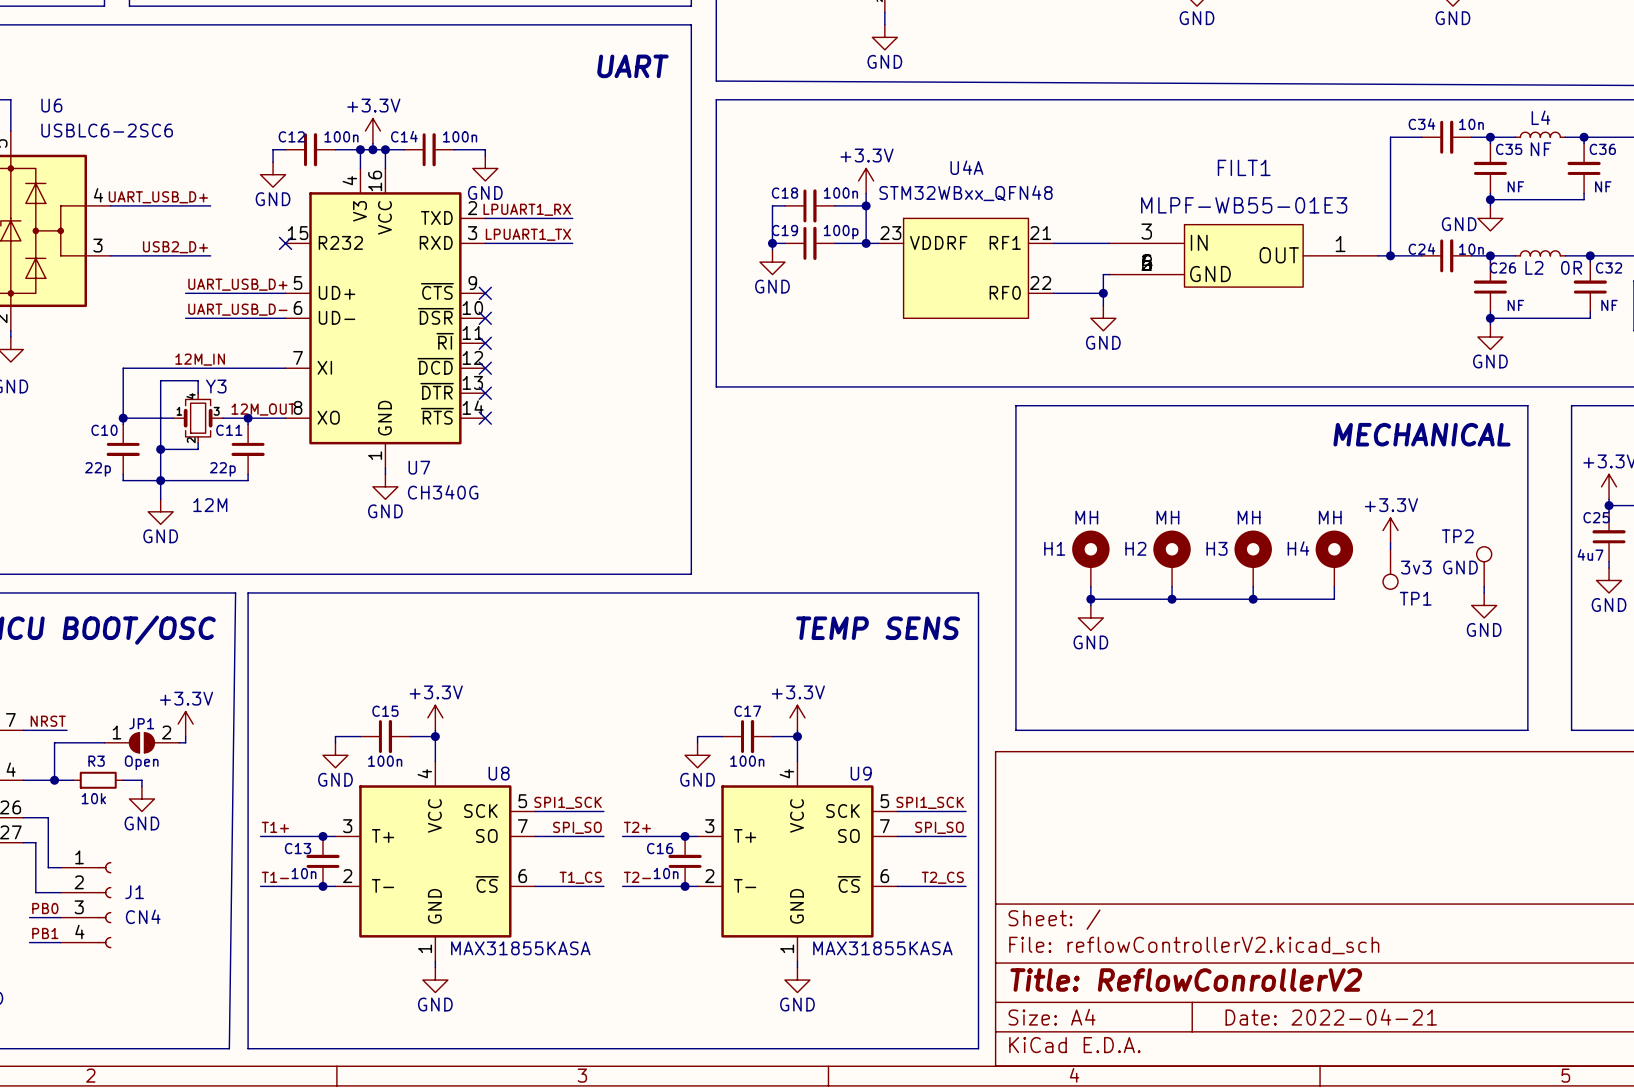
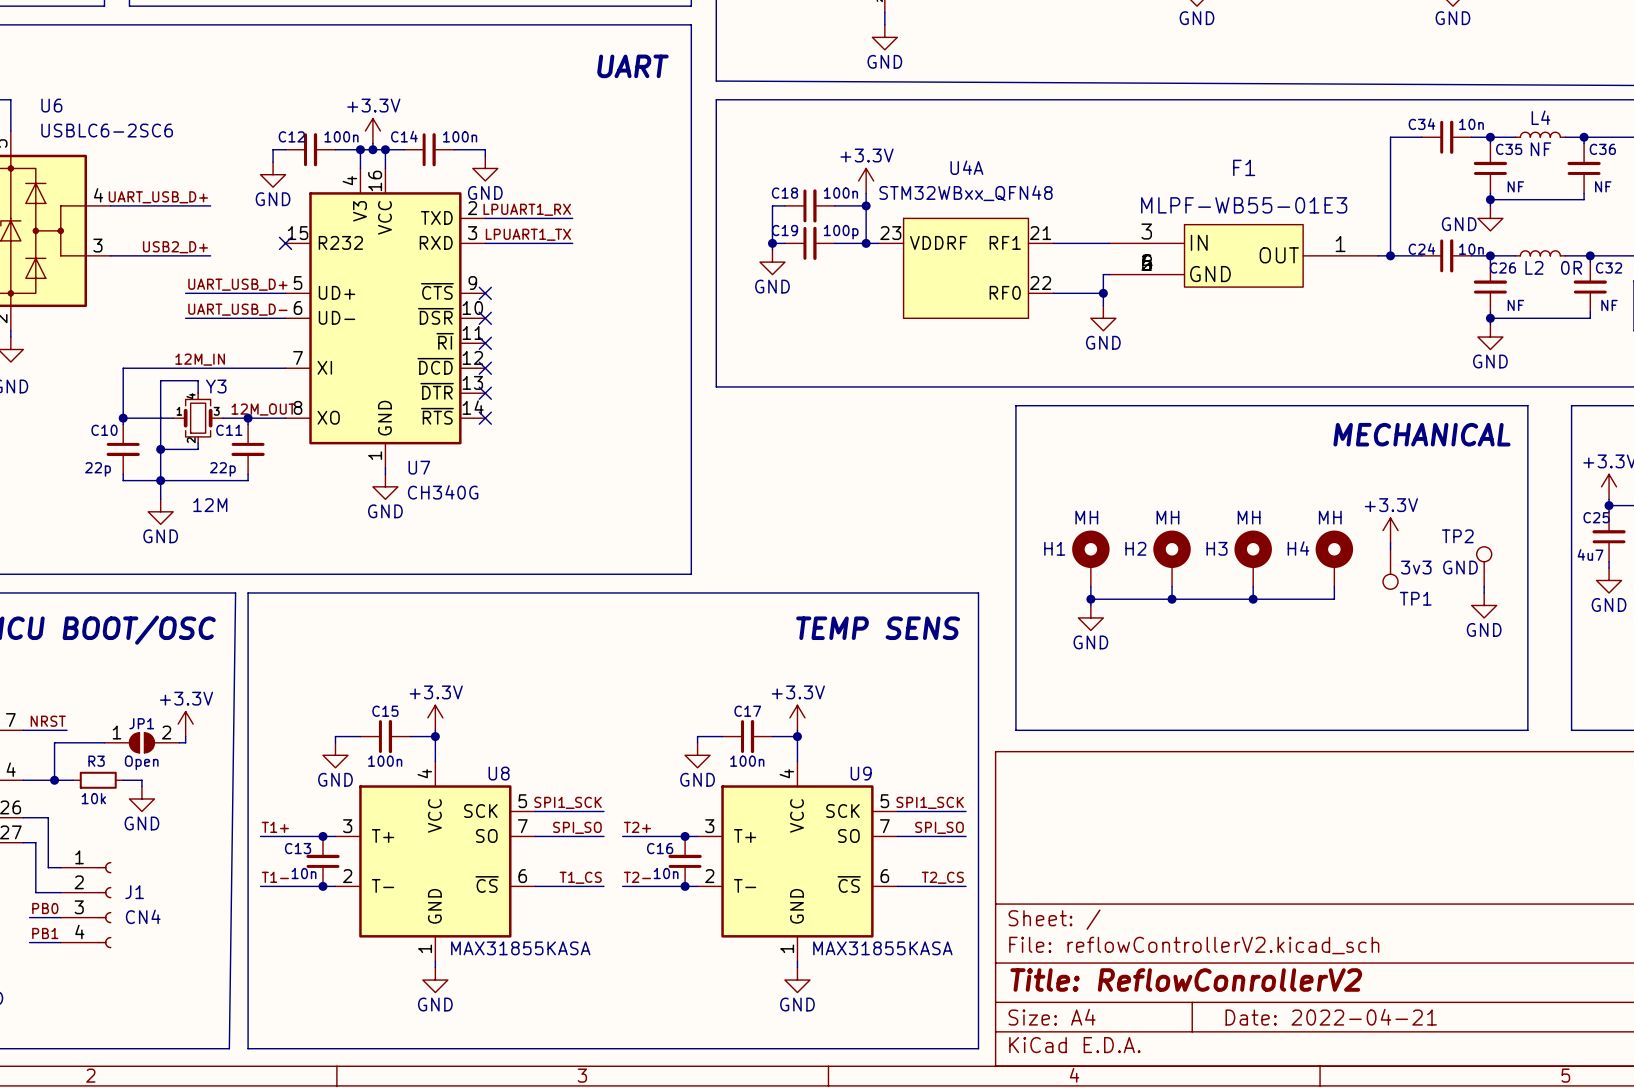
FILT1 name: FILT1 (1244, 167) -> F1 (1244, 167)

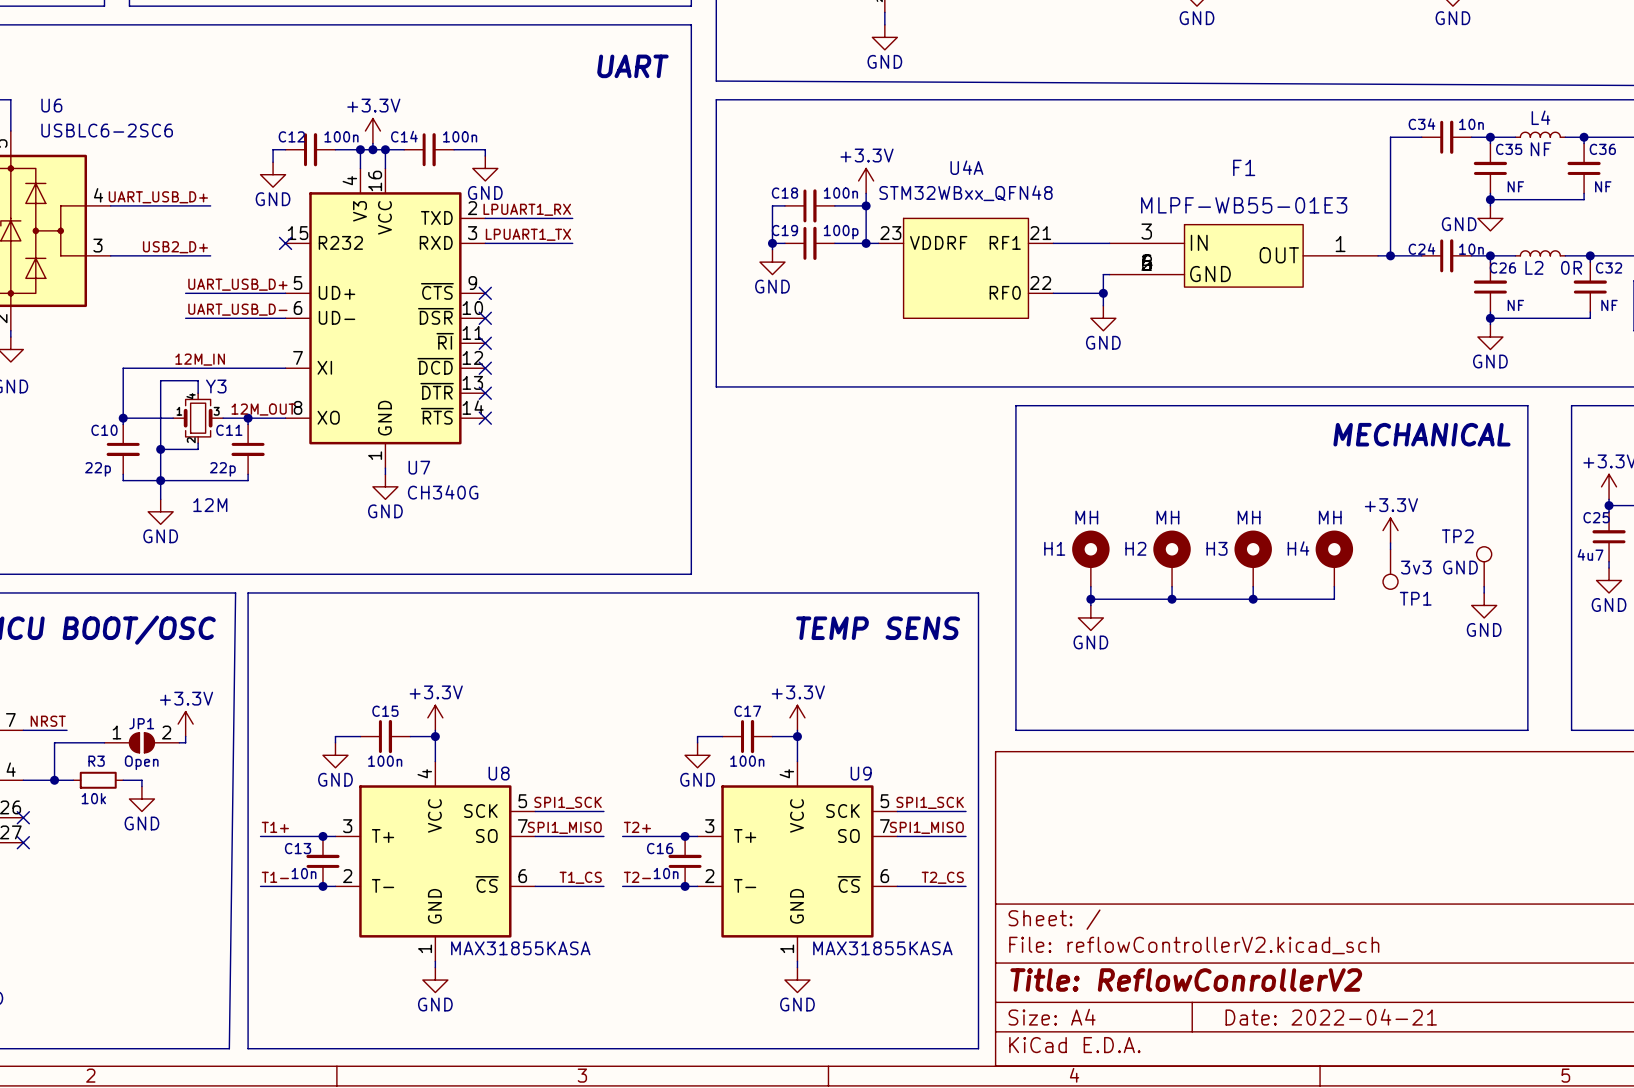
wire: (23, 817) (48, 817) (48, 867) (60, 867) -> none
no-connect mark: none -> (23, 817)
label: SPI_SO (577, 827) -> SPI1_MISO (564, 827)
label: SPI_SO (939, 827) -> SPI1_MISO (926, 827)
wire: (23, 842) (35, 842) (35, 892) (60, 892) -> none
no-connect mark: none -> (23, 842)
J1: CN4 (86, 905) -> none
label: PB0 (45, 908) -> none
wire: (29, 917) (60, 917) -> none
label: PB1 (45, 933) -> none
wire: (29, 942) (60, 942) -> none

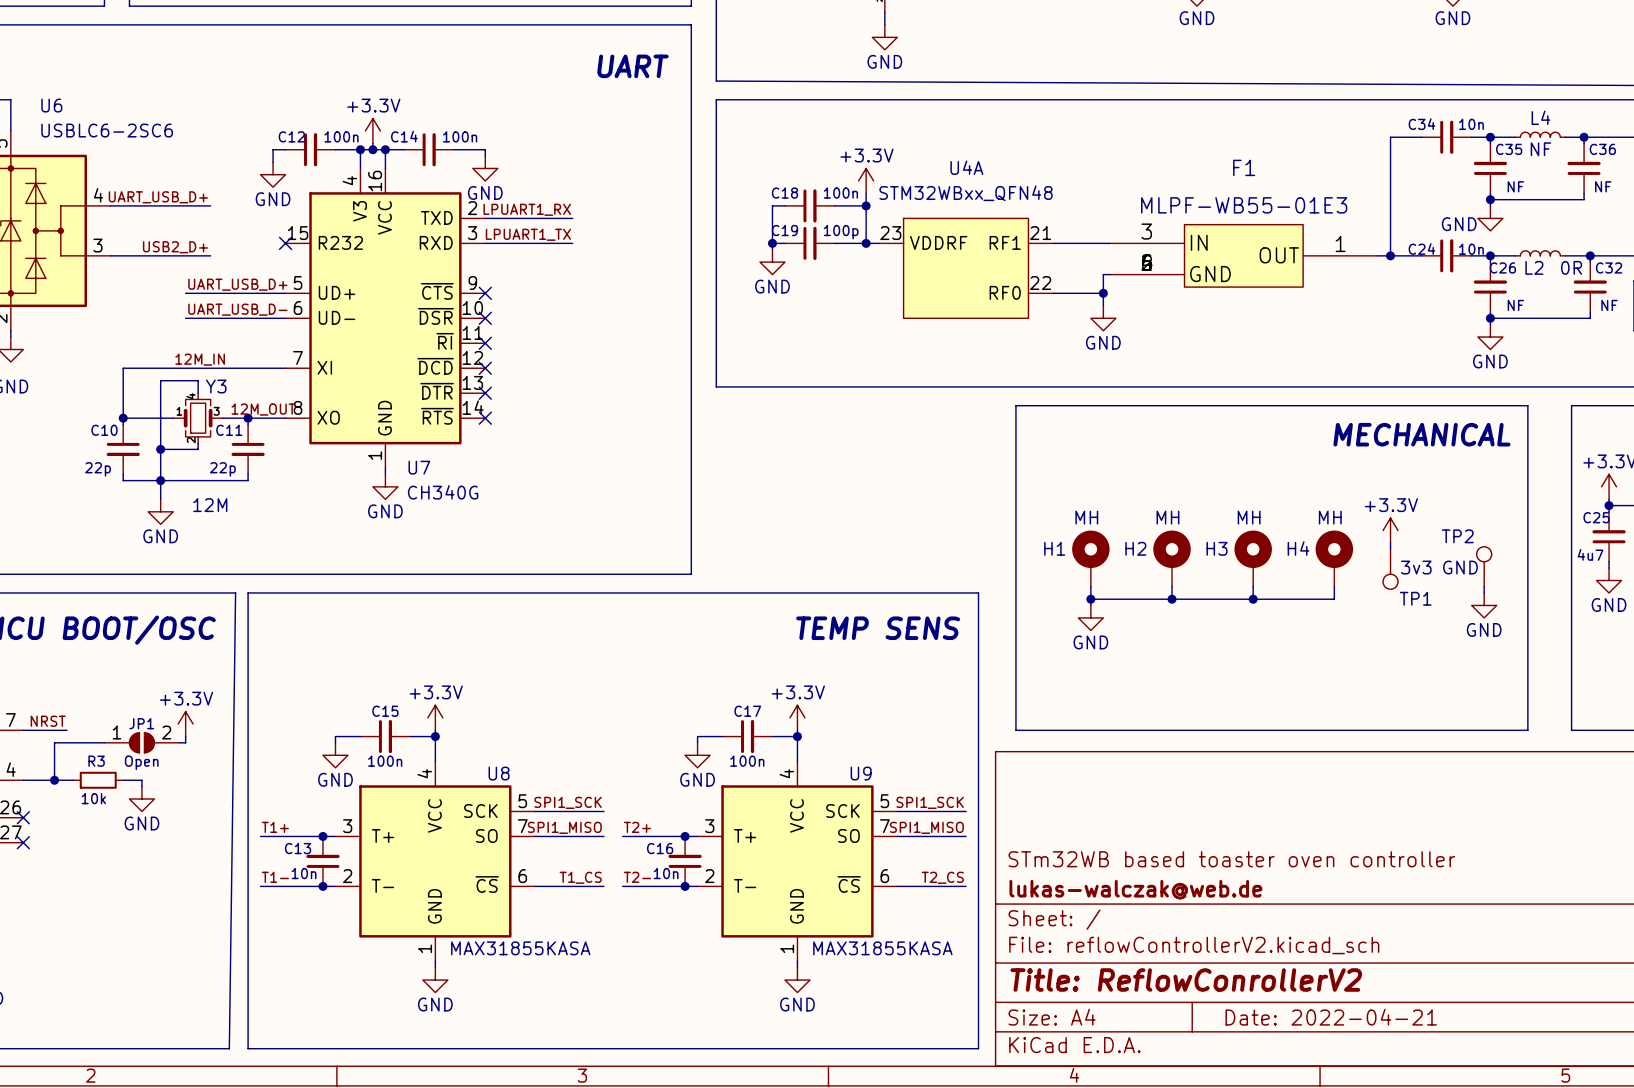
title block: none -> STm32WB based toaster oven controller (1231, 859)
title block: none -> lukas-walczak@web.de (1135, 889)

